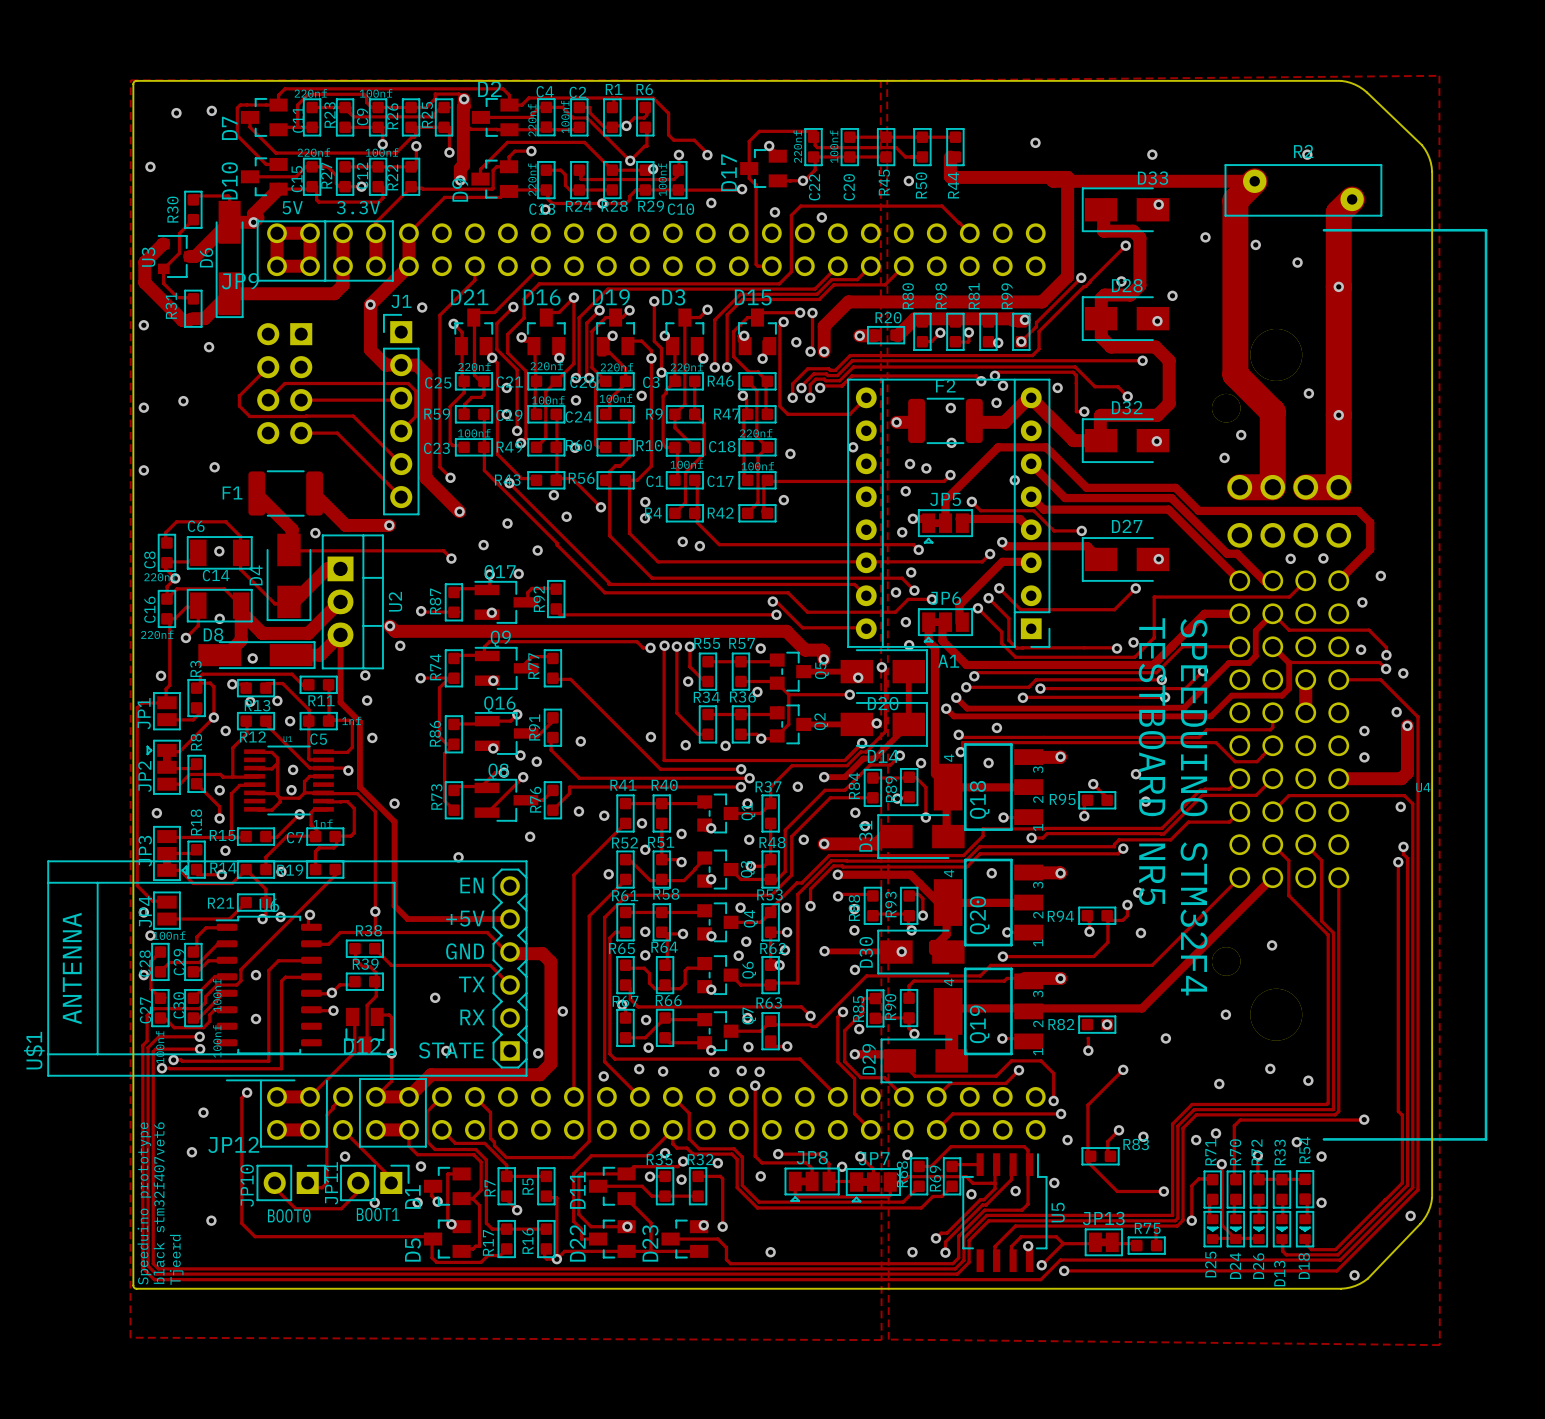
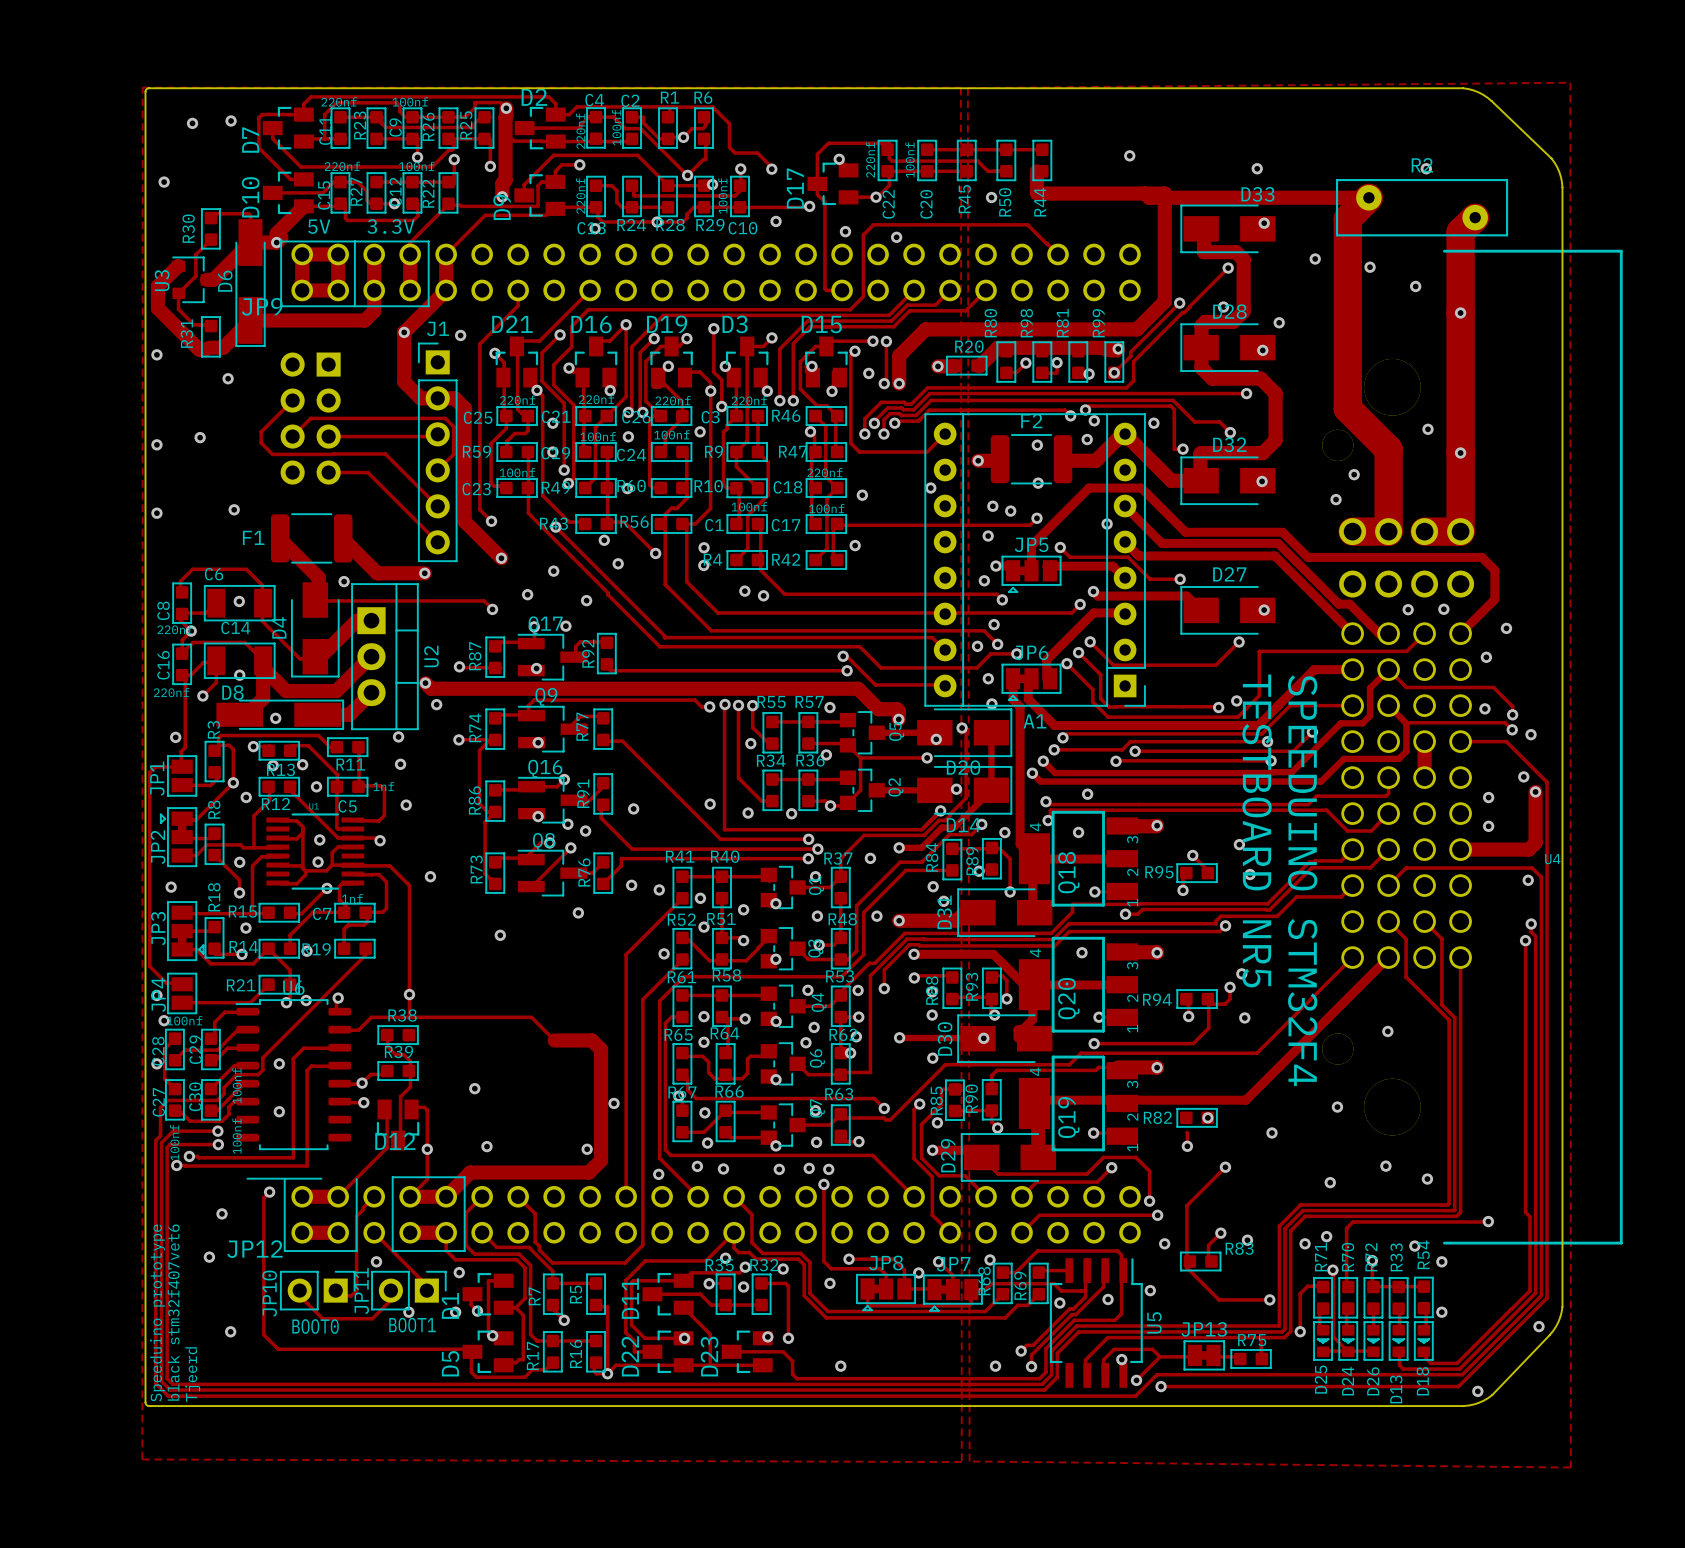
track: (340, 634) (340, 702) (359, 721) (359, 787) (394, 821) (394, 905) (407, 919) (510, 919) -> none
track: (374, 948) (391, 965) (490, 965) (510, 985) -> none
U$1: (287, 968) -> none

